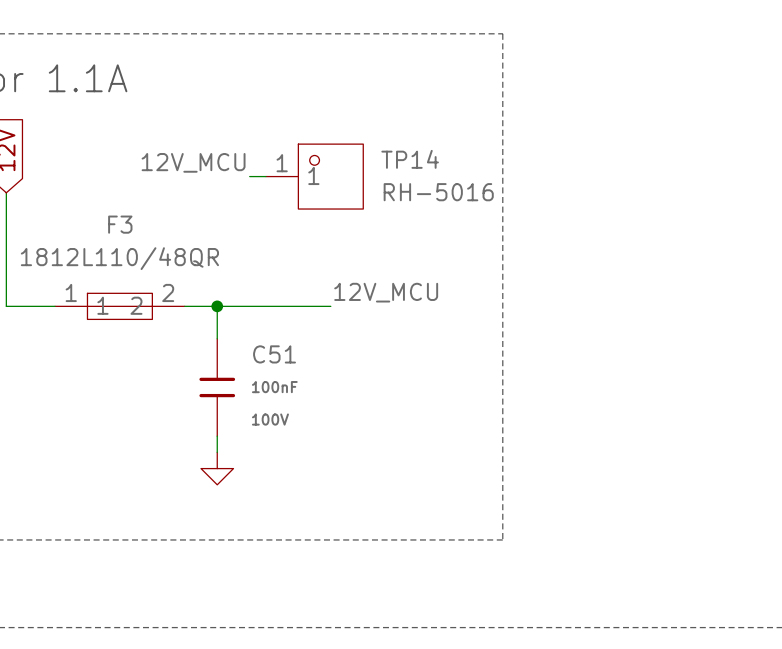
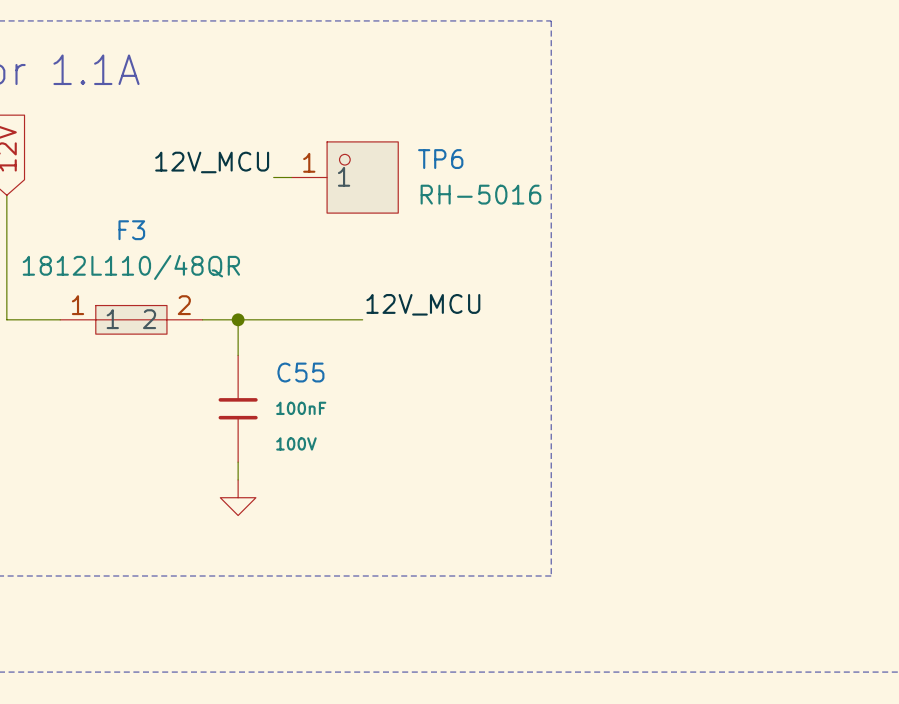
TP14 name: TP14 (410, 159) -> TP6 (440, 159)
C51 name: C51 (274, 354) -> C55 (300, 372)

